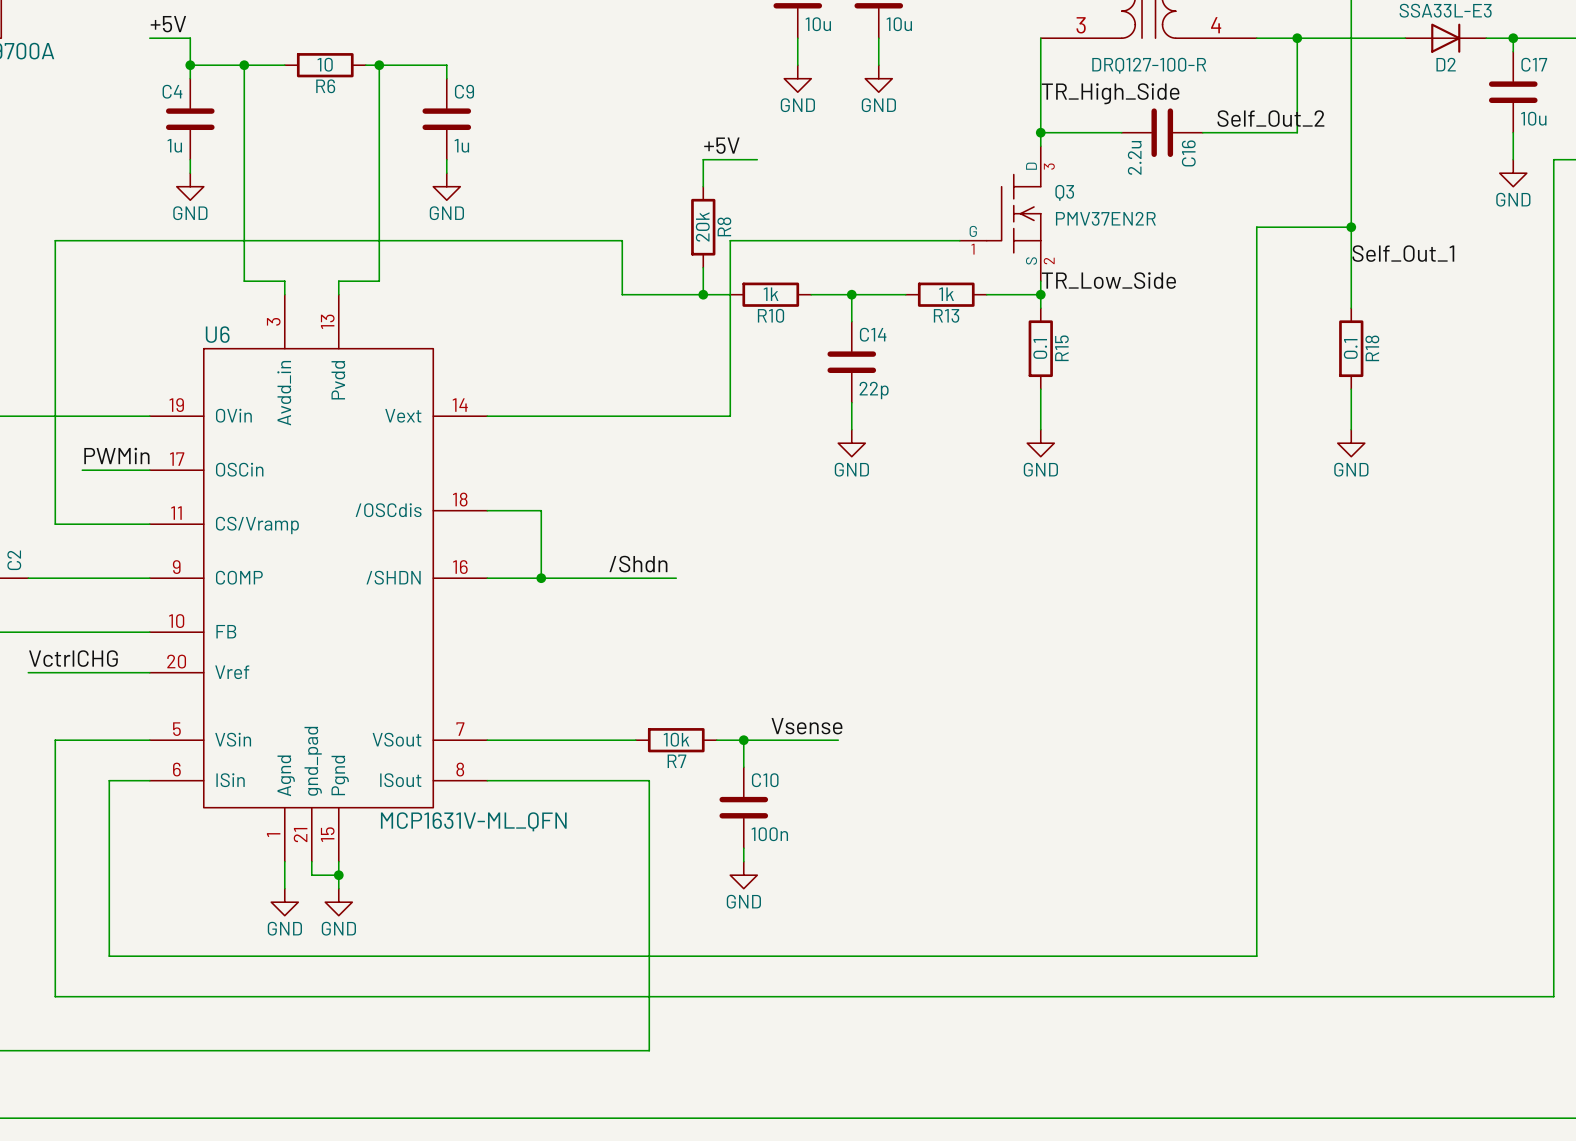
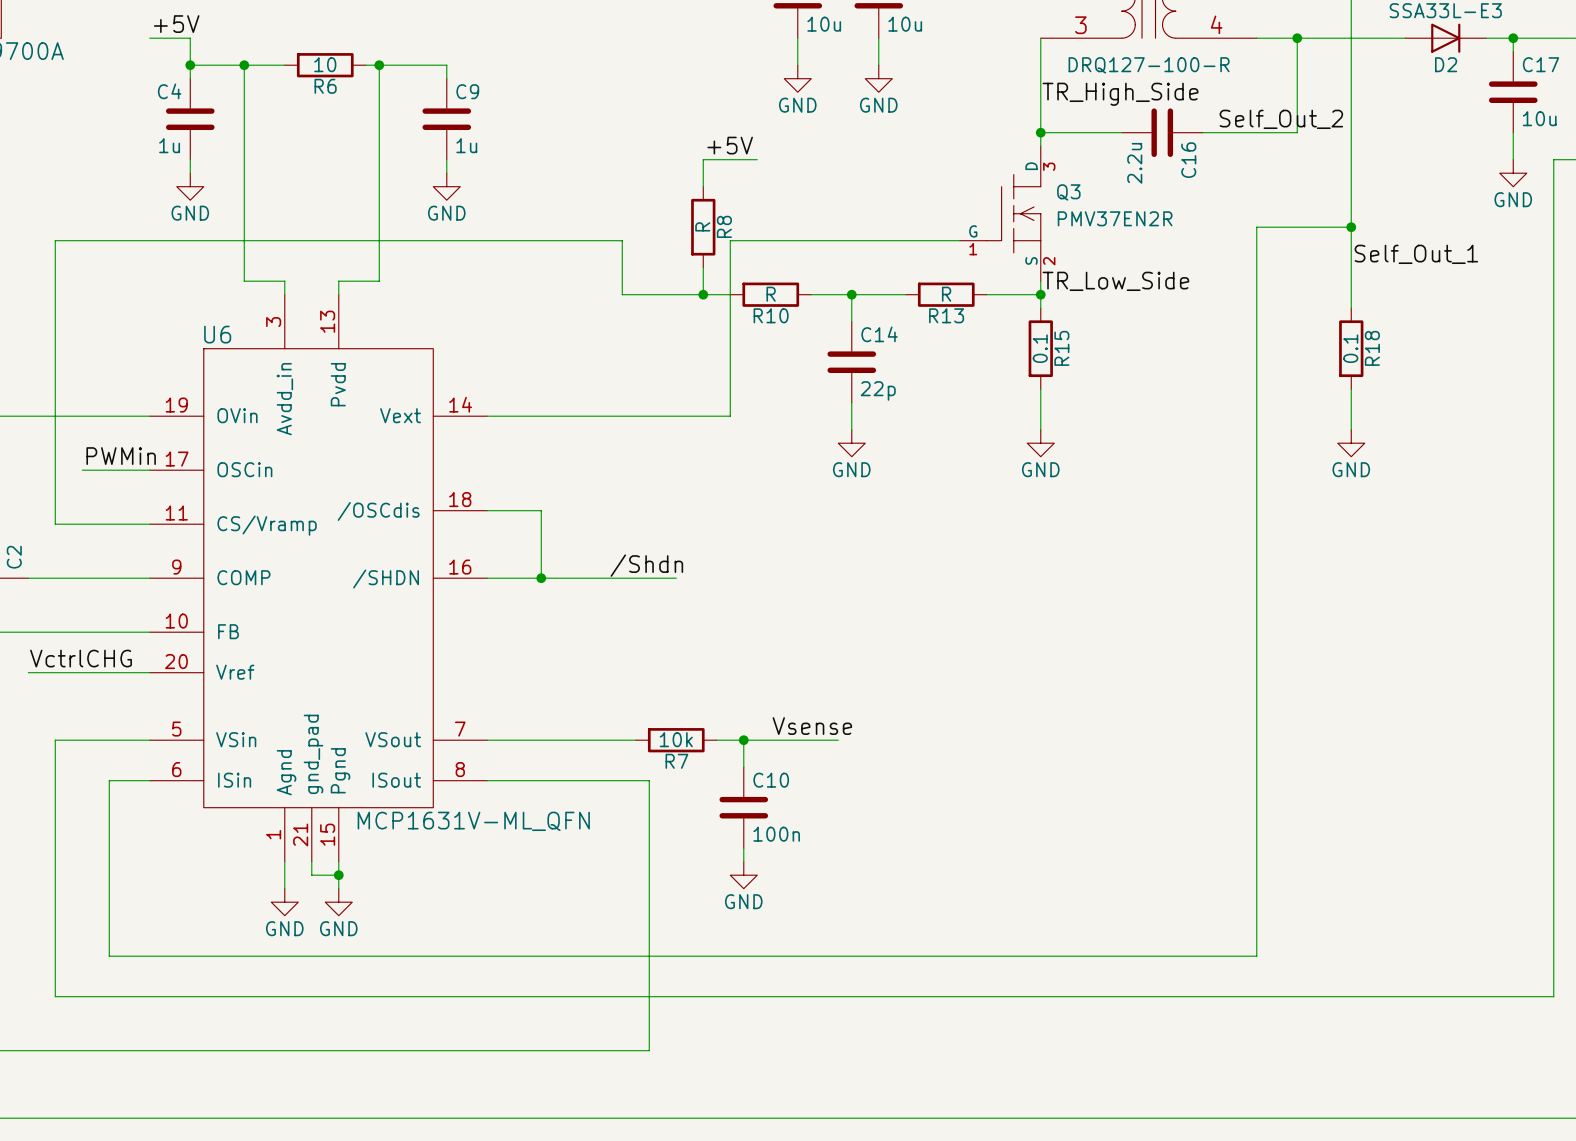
R8 value: 20k (702, 226) -> R (702, 226)
R10 value: 1k (771, 294) -> R (771, 294)
R13 value: 1k (946, 294) -> R (946, 294)

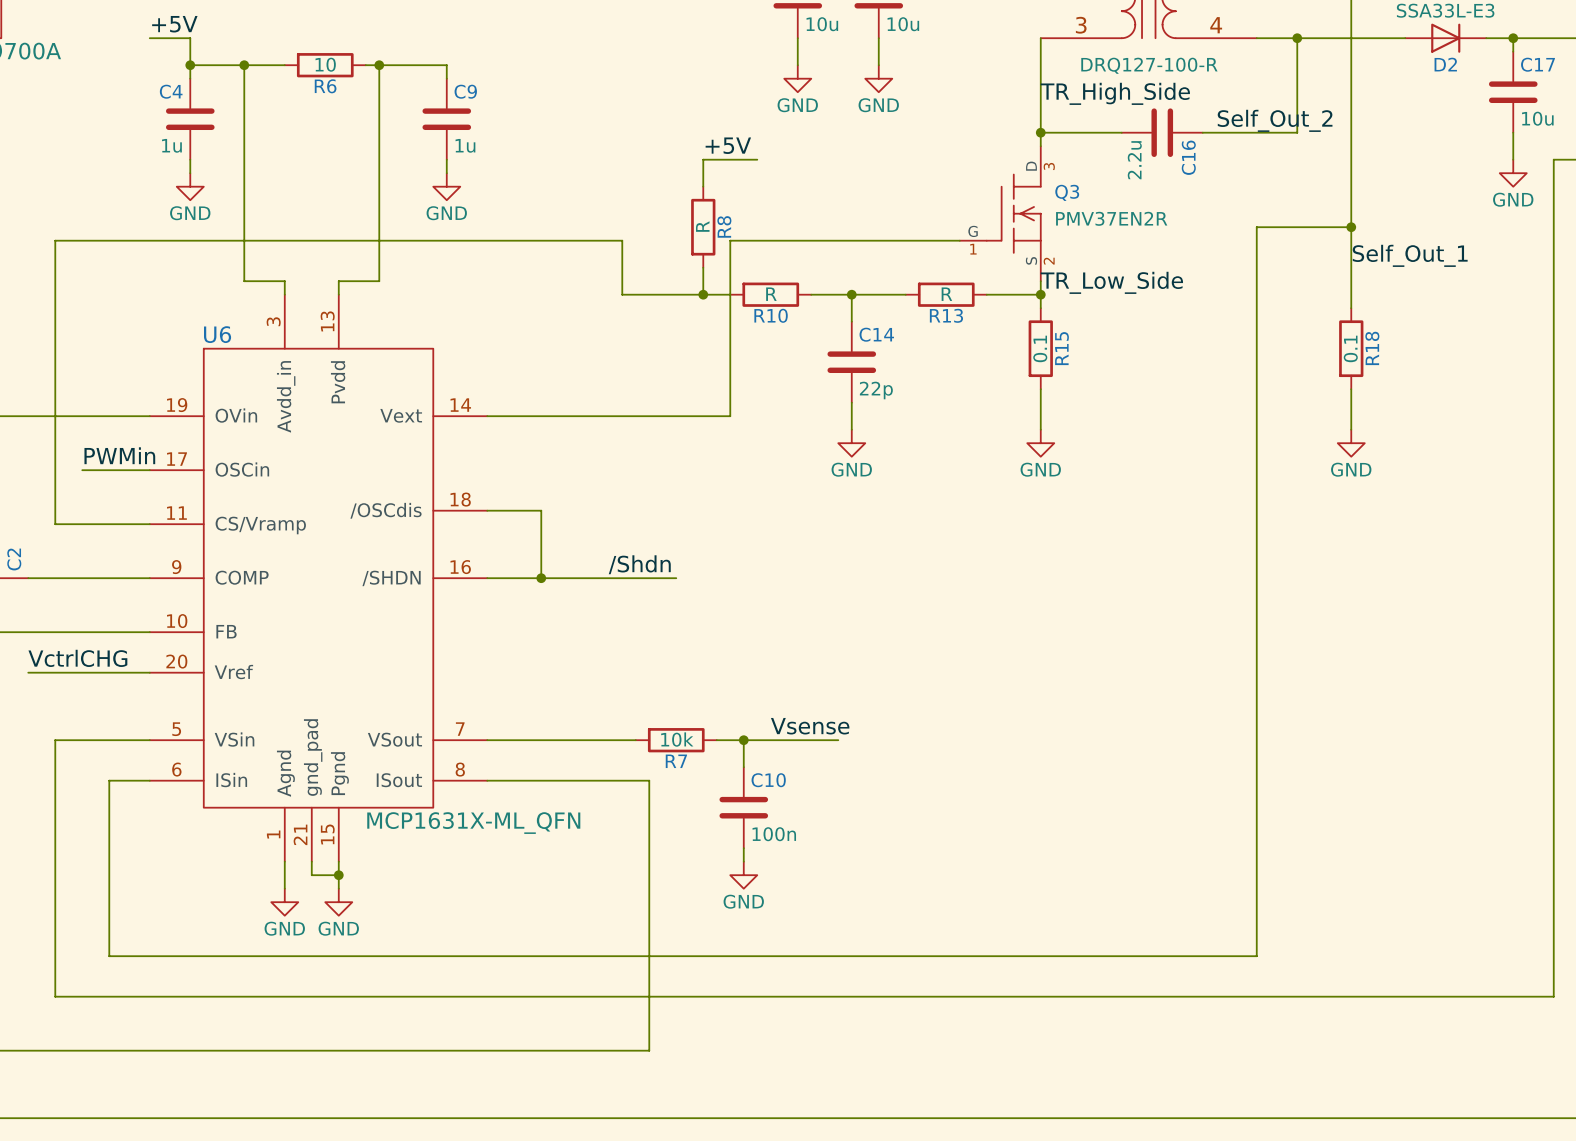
U6 value: MCP1631V-ML_QFN (473, 821) -> MCP1631X-ML_QFN (473, 823)

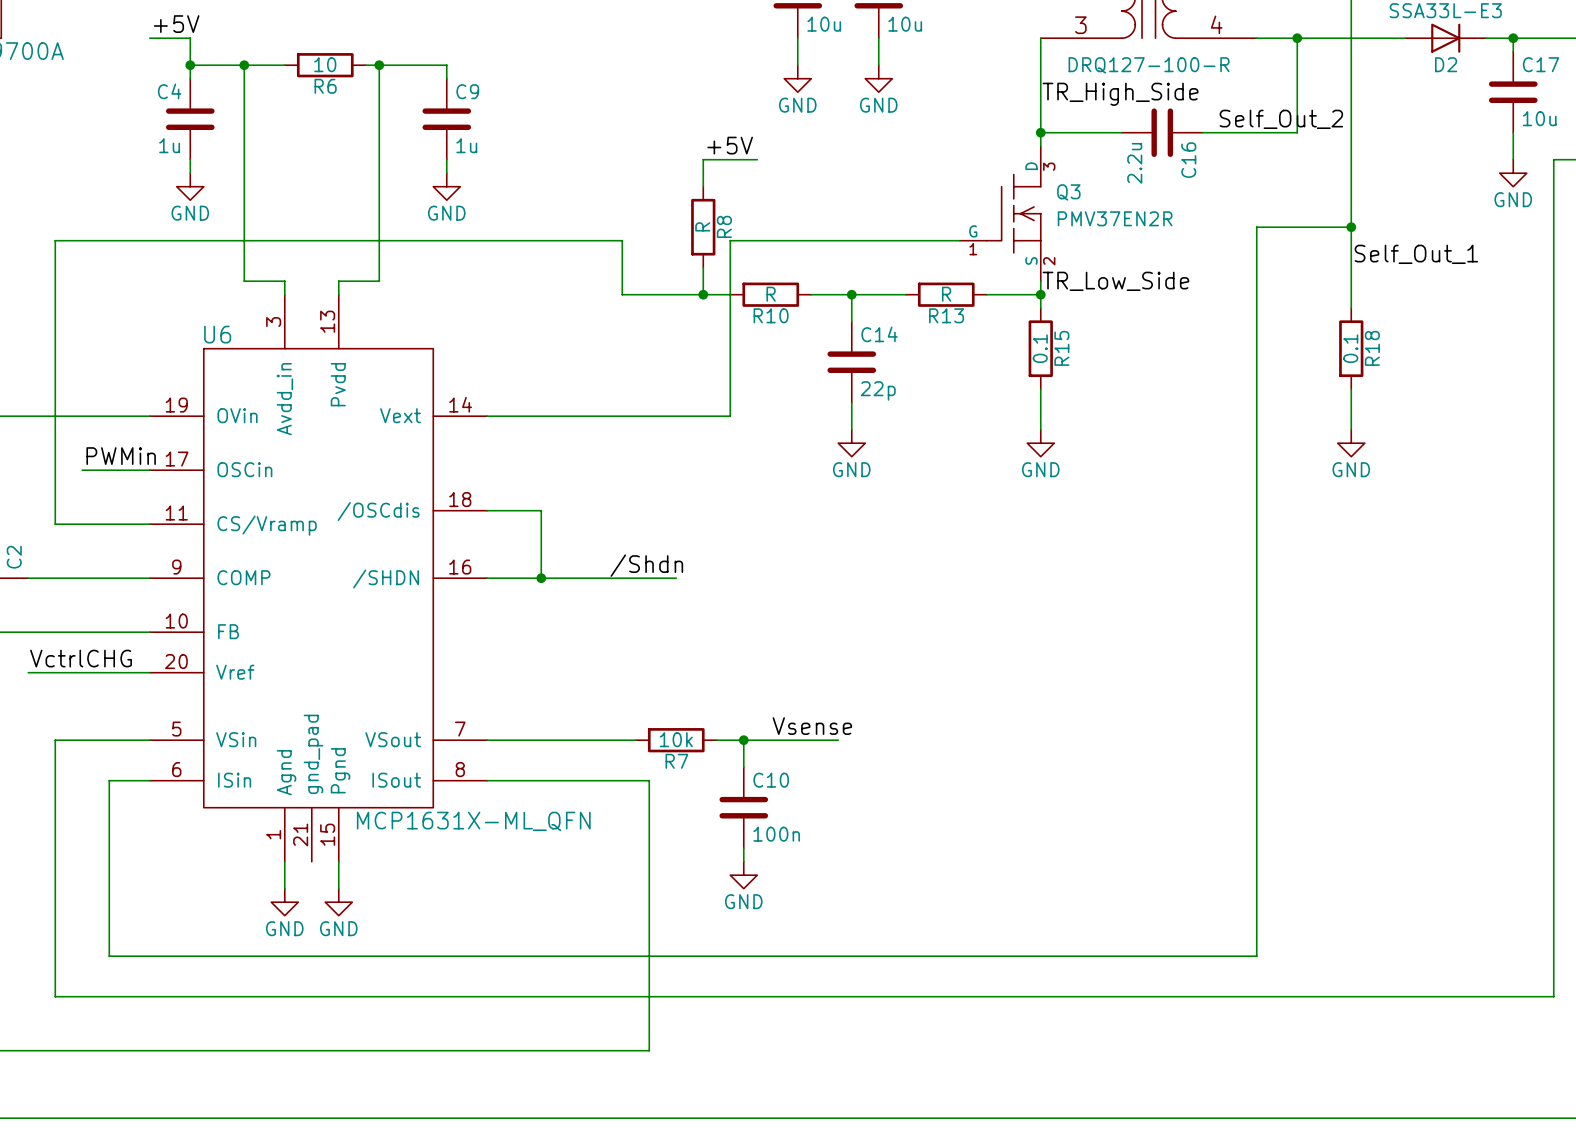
wire: (311, 861) (311, 875) (338, 875) -> none
junction: (338, 875) -> none

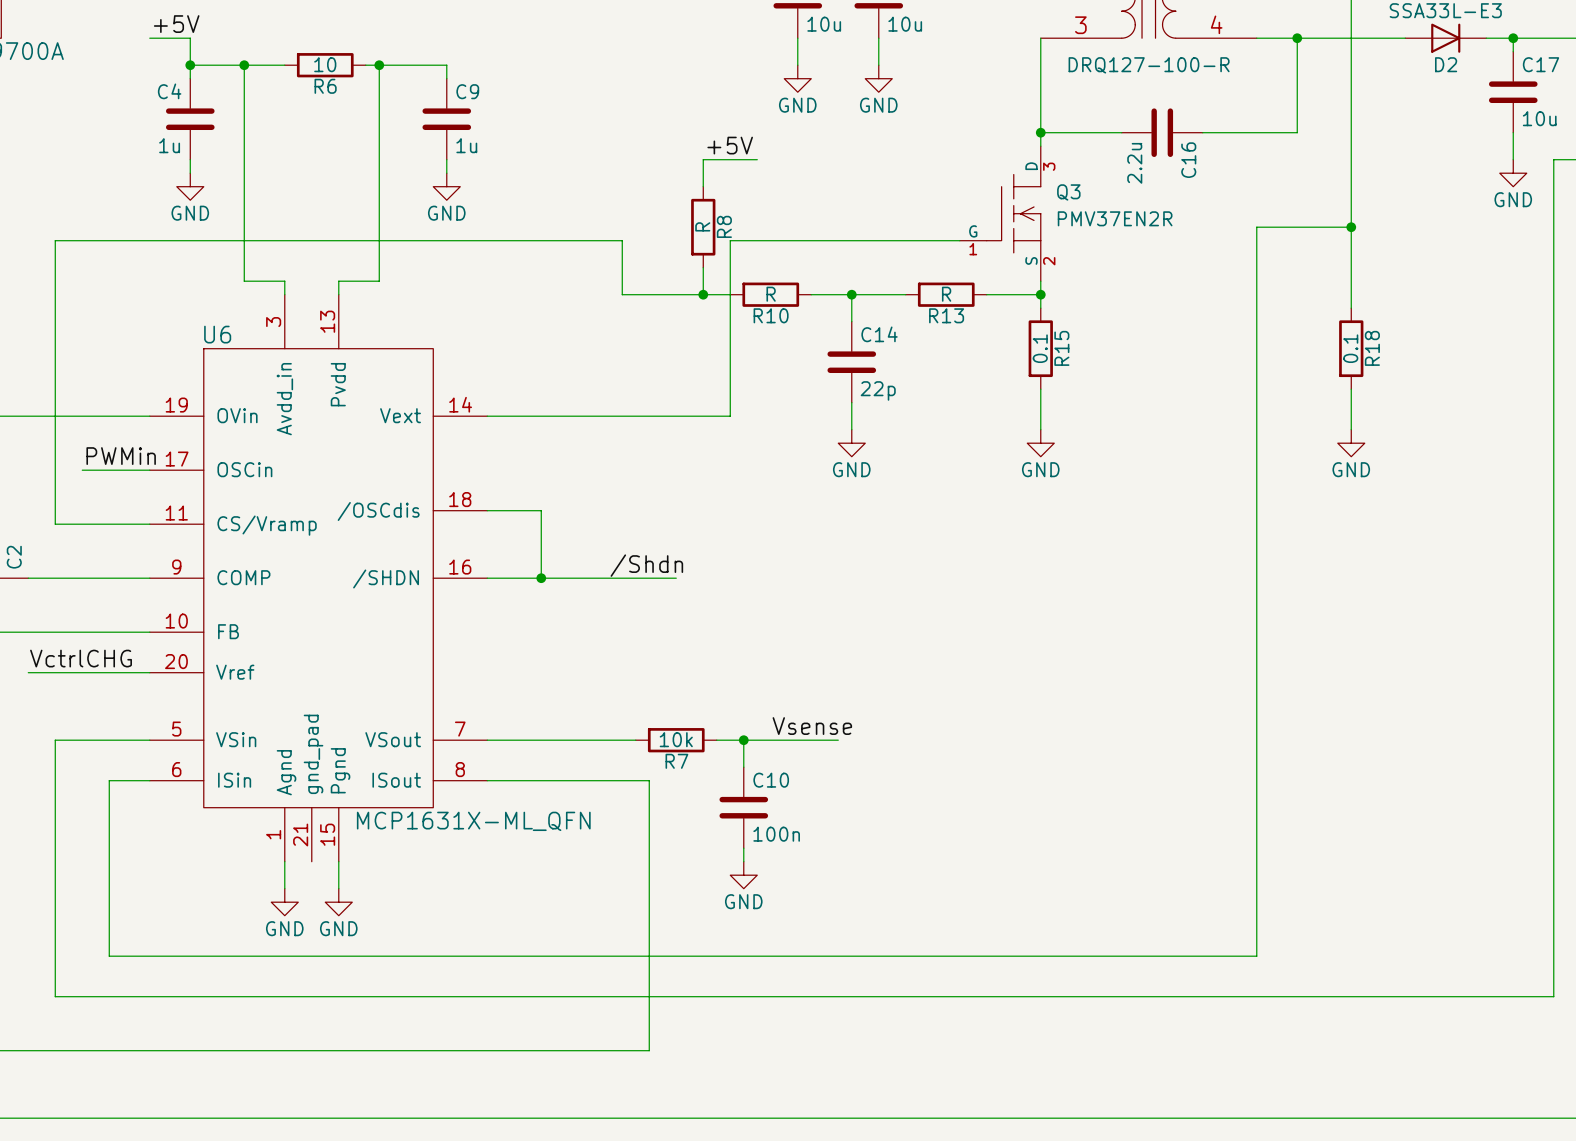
label: TR_High_Side (1120, 94) -> none
label: Self_Out_2 (1281, 119) -> none
label: Self_Out_1 (1416, 254) -> none
label: TR_Low_Side (1115, 281) -> none

